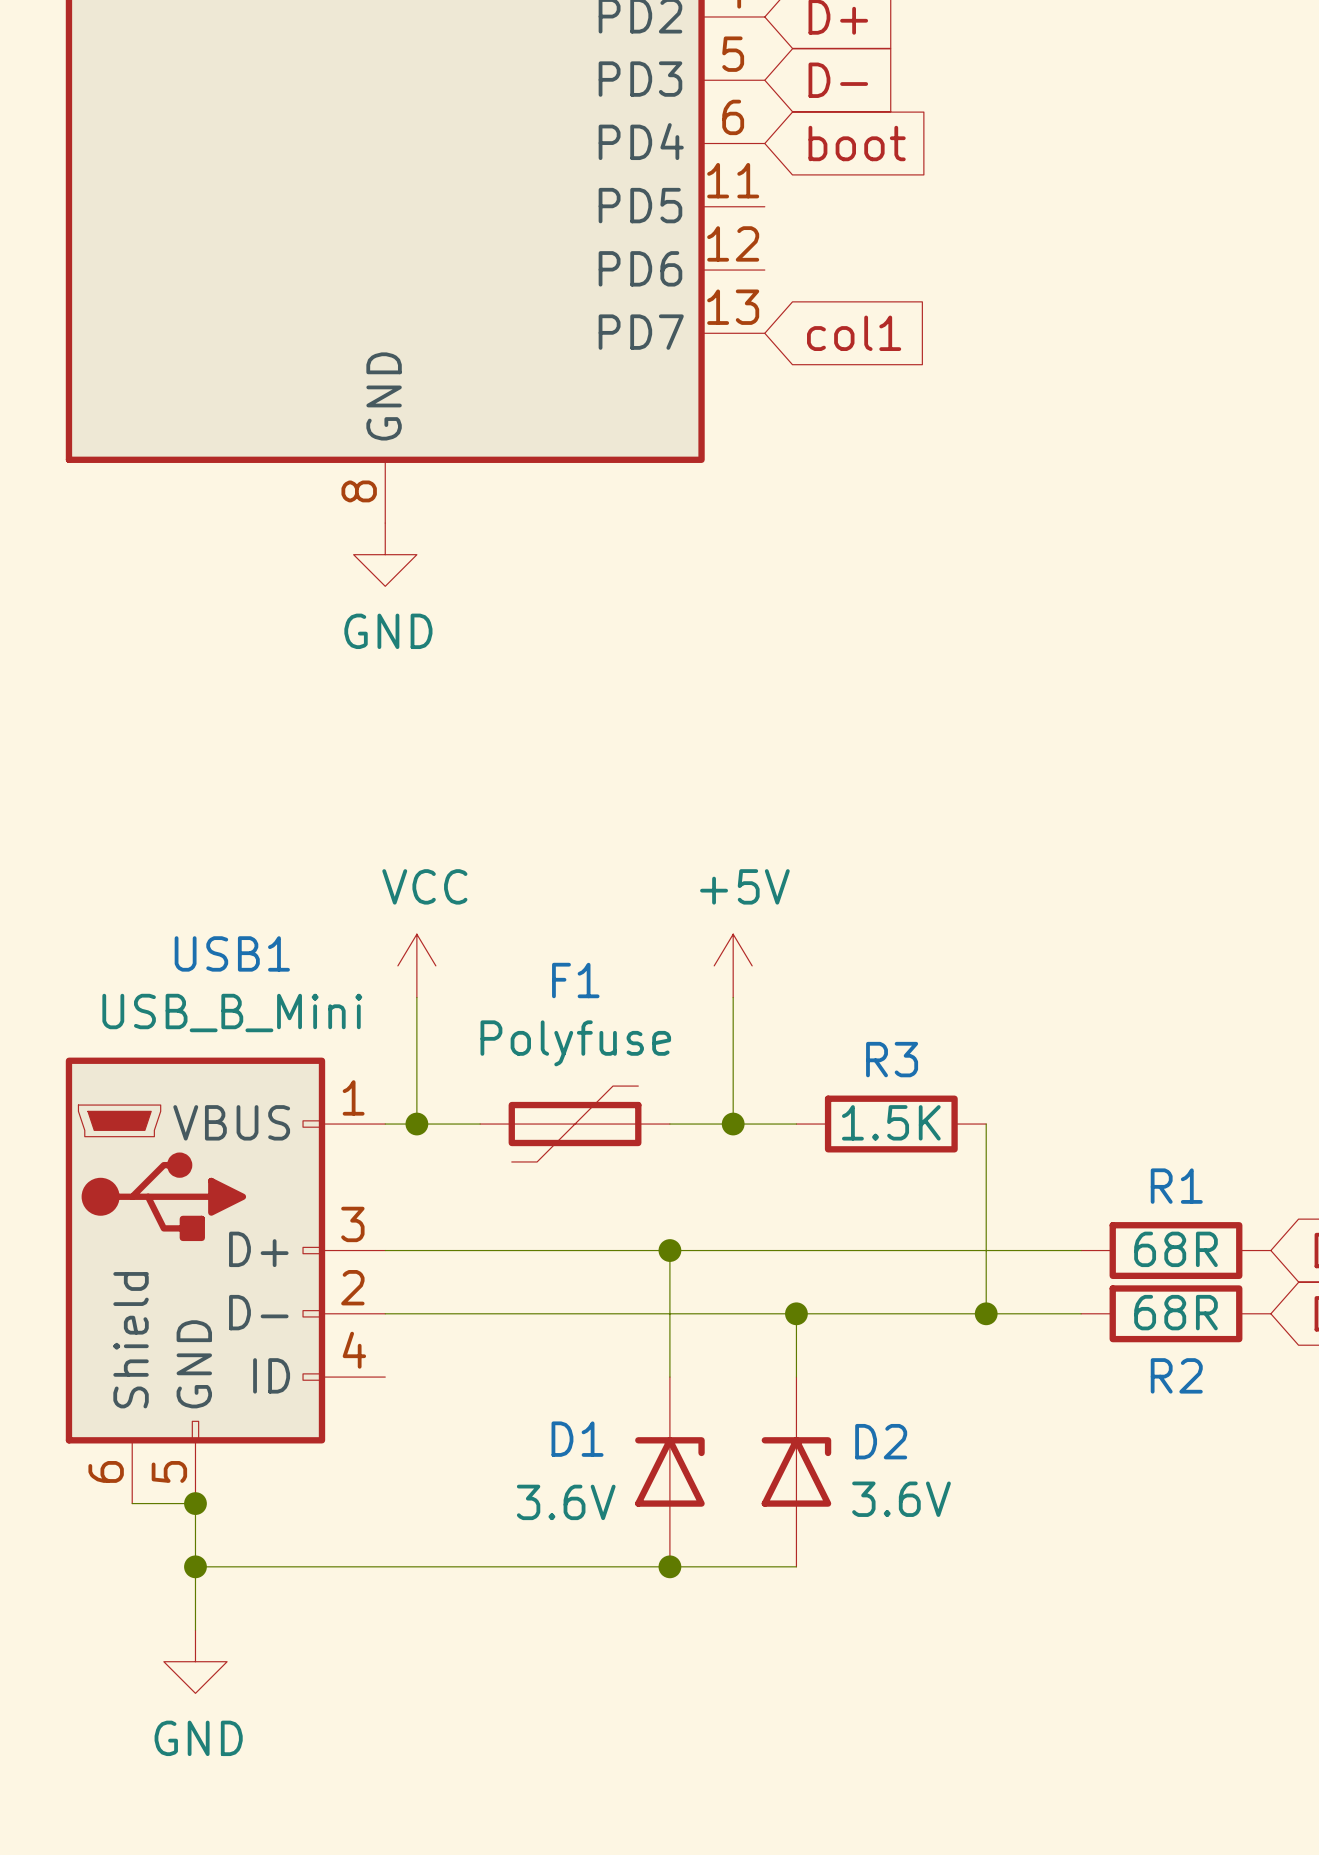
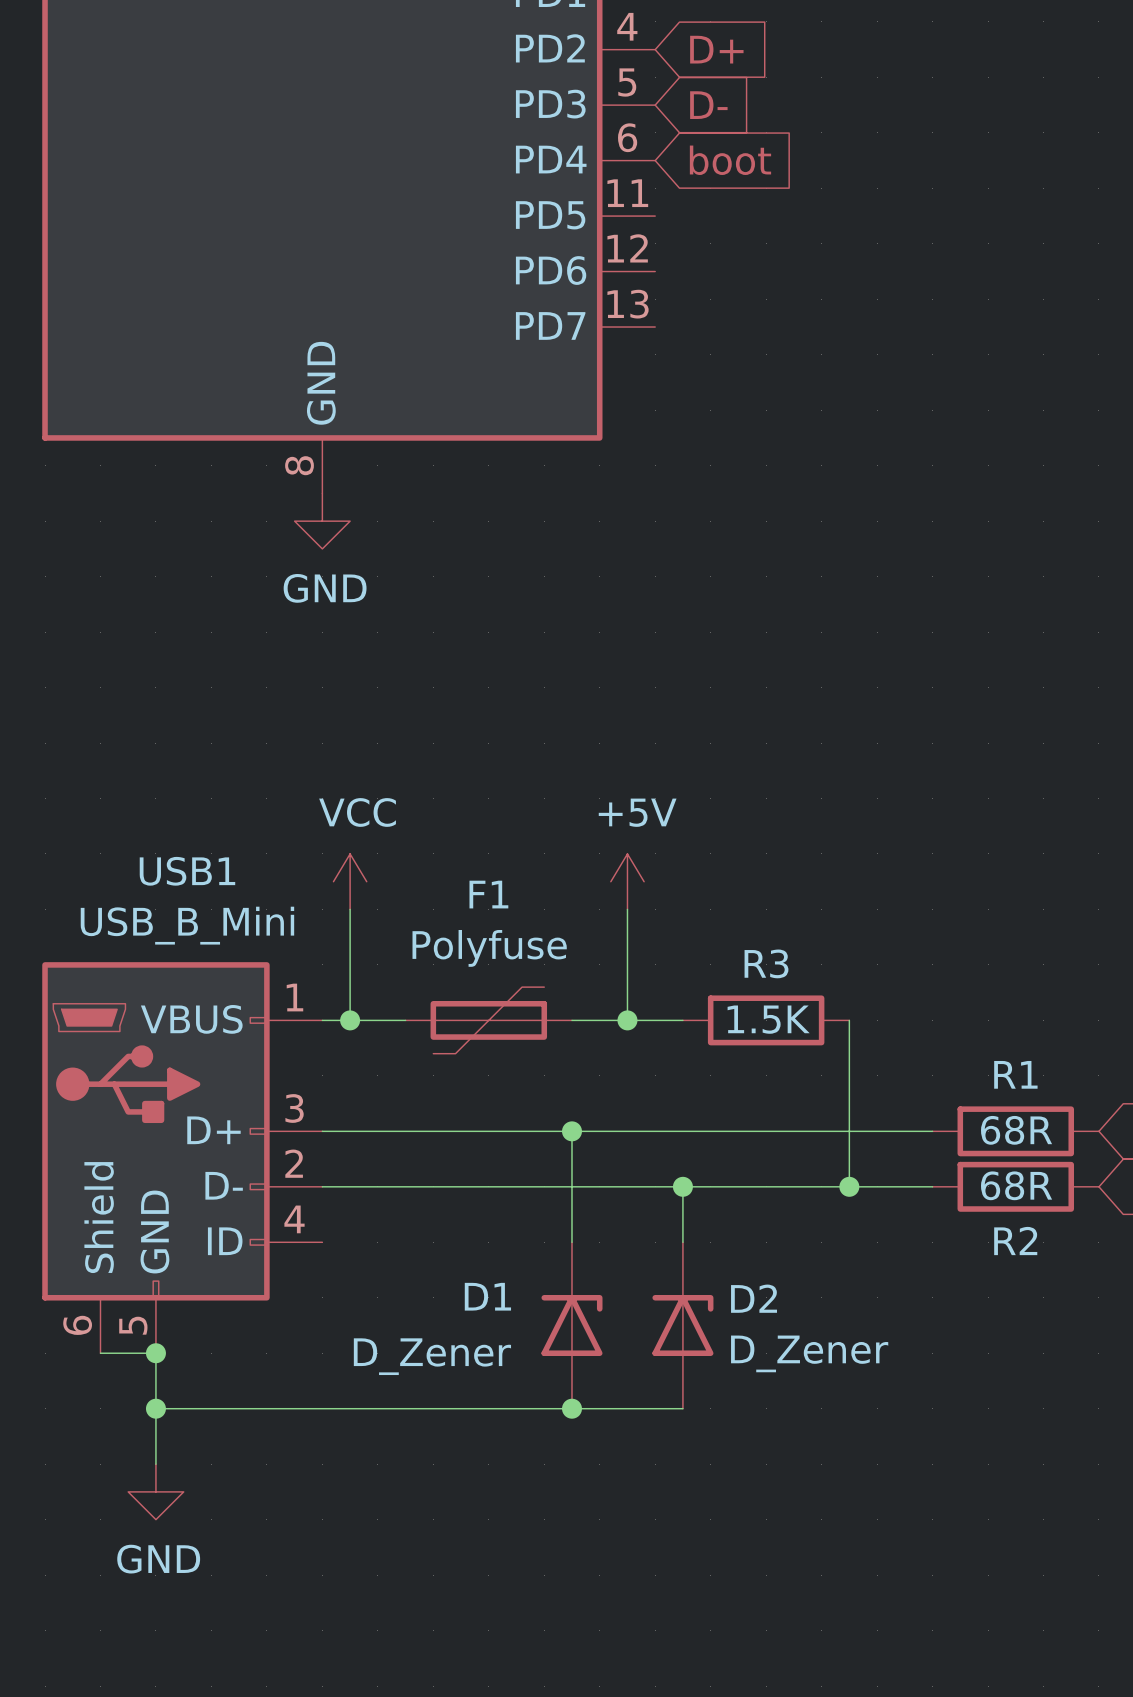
global label: col1 (854, 333) -> none
D2 value: 3.6V (901, 1499) -> D_Zener (809, 1353)
D1 value: 3.6V (566, 1502) -> D_Zener (432, 1356)

